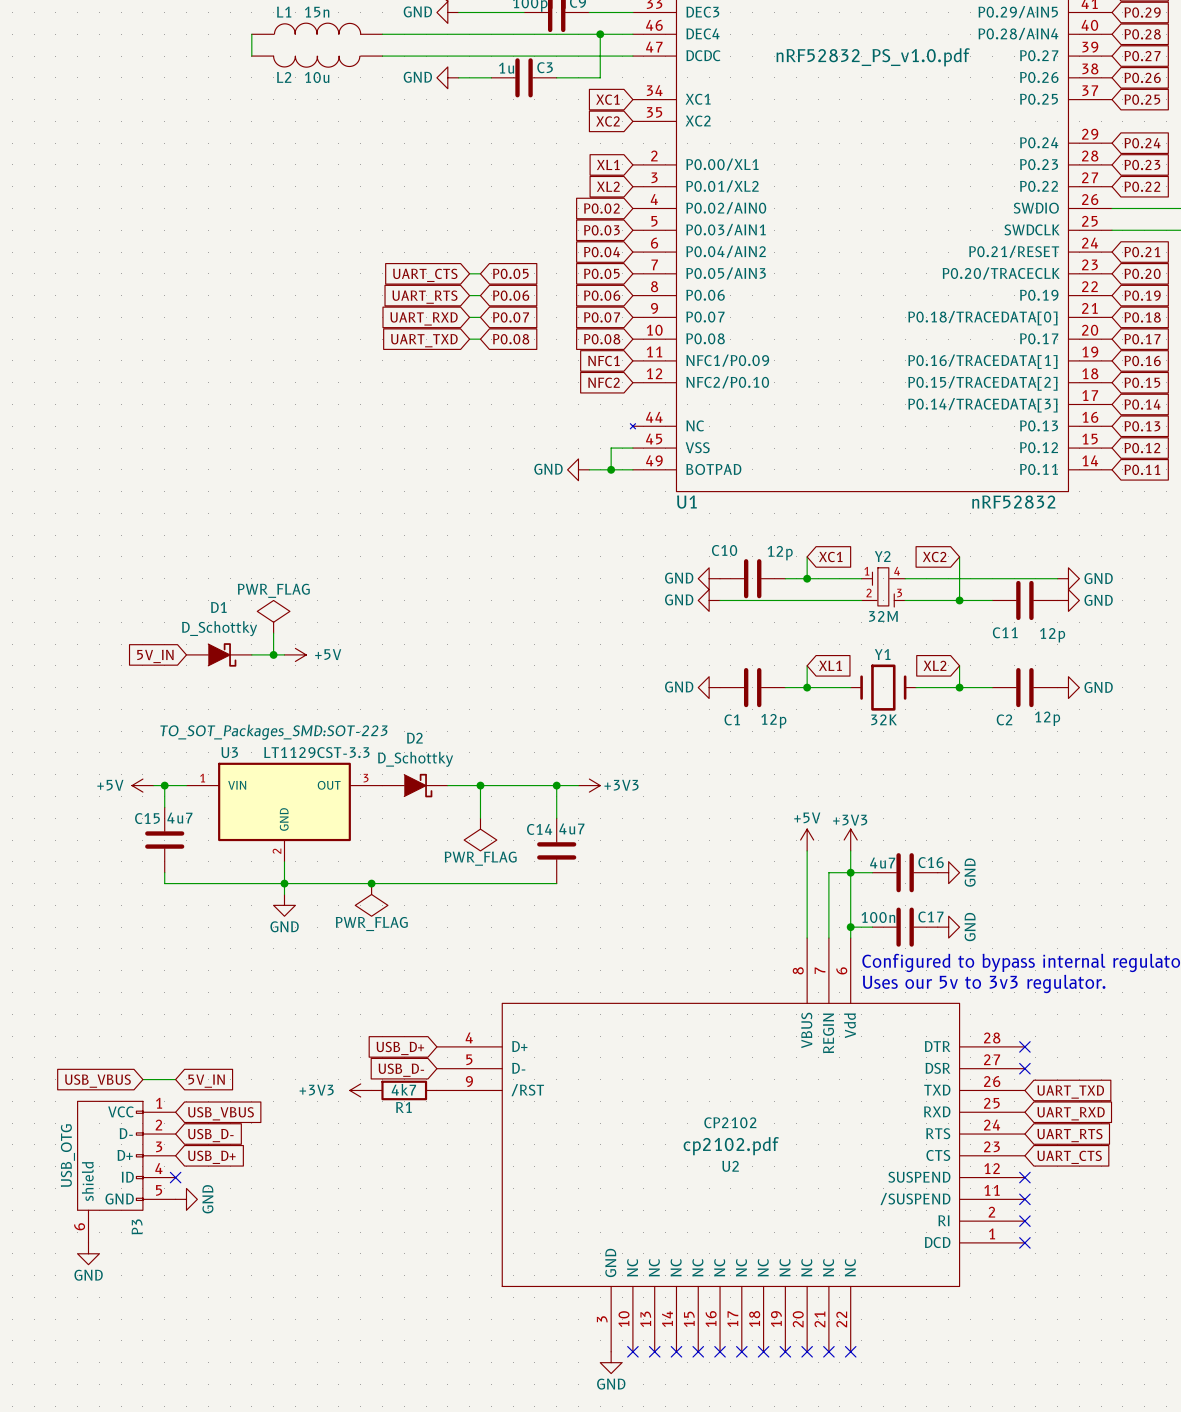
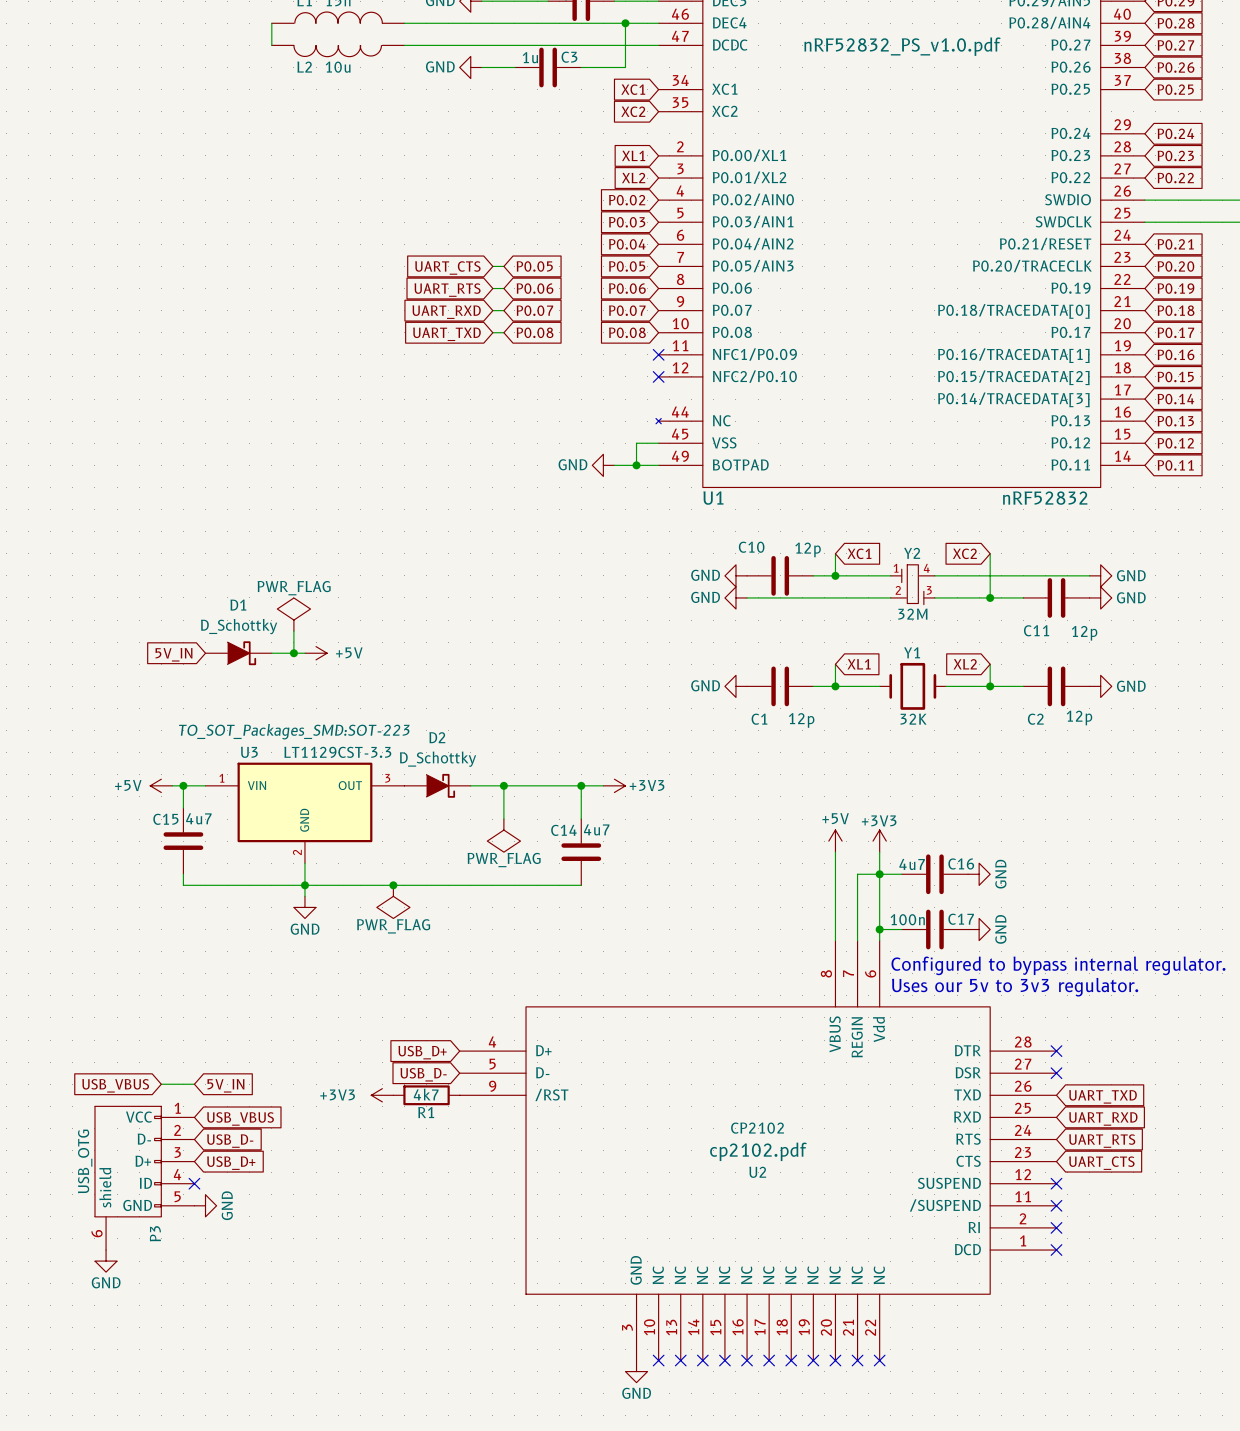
global label: NFC1 (603, 360) -> none
no-connect mark: none -> (658, 354)
global label: NFC2 (603, 382) -> none
no-connect mark: none -> (658, 376)

